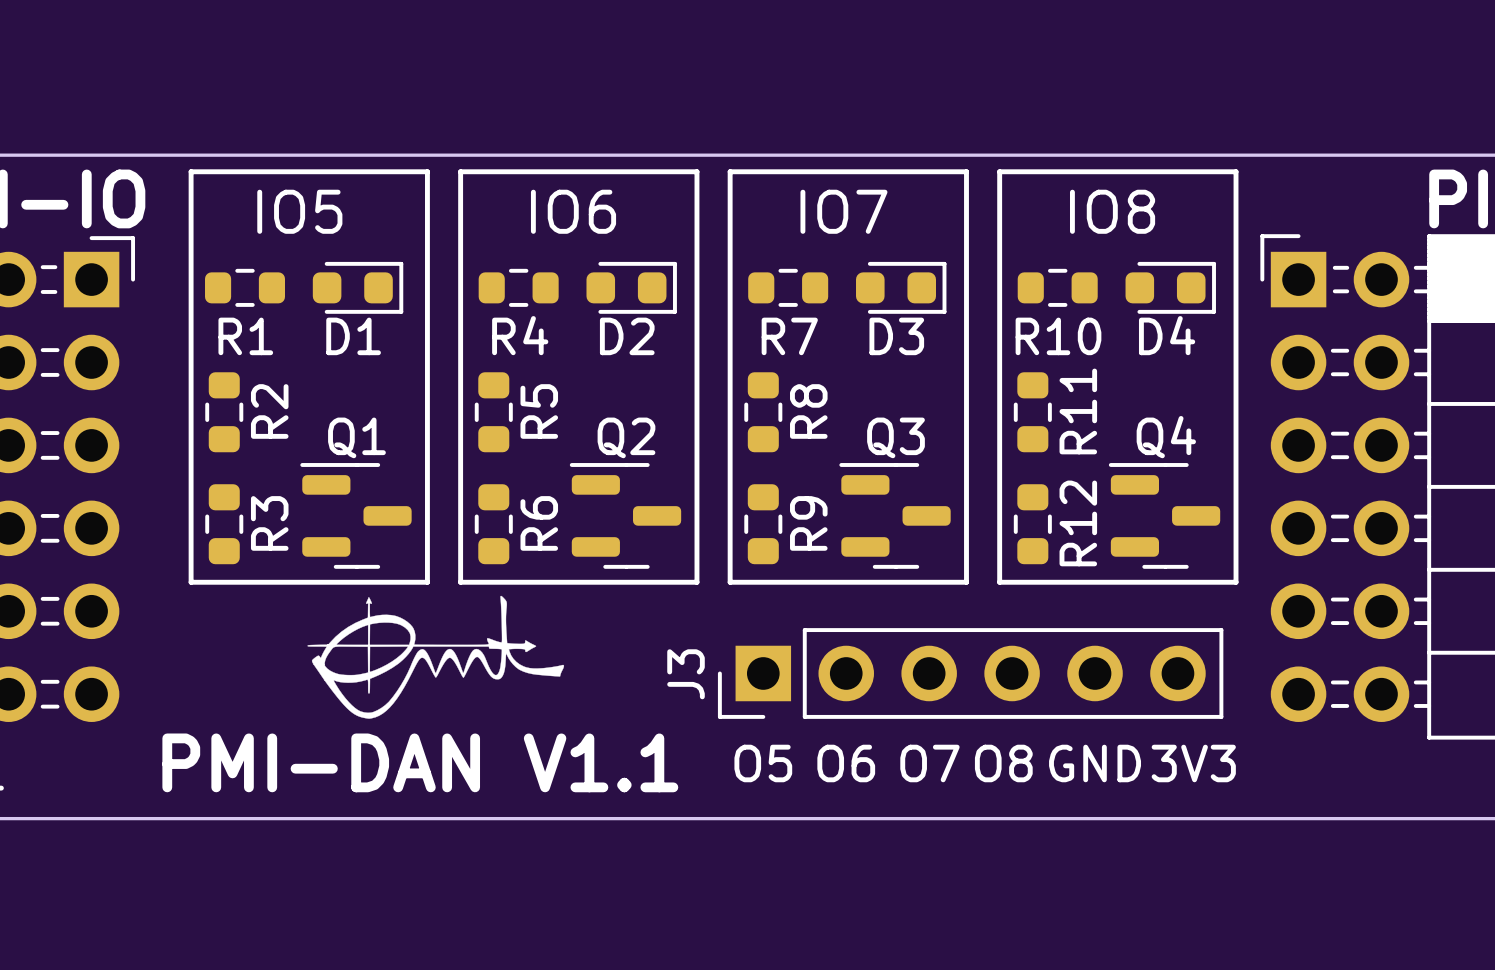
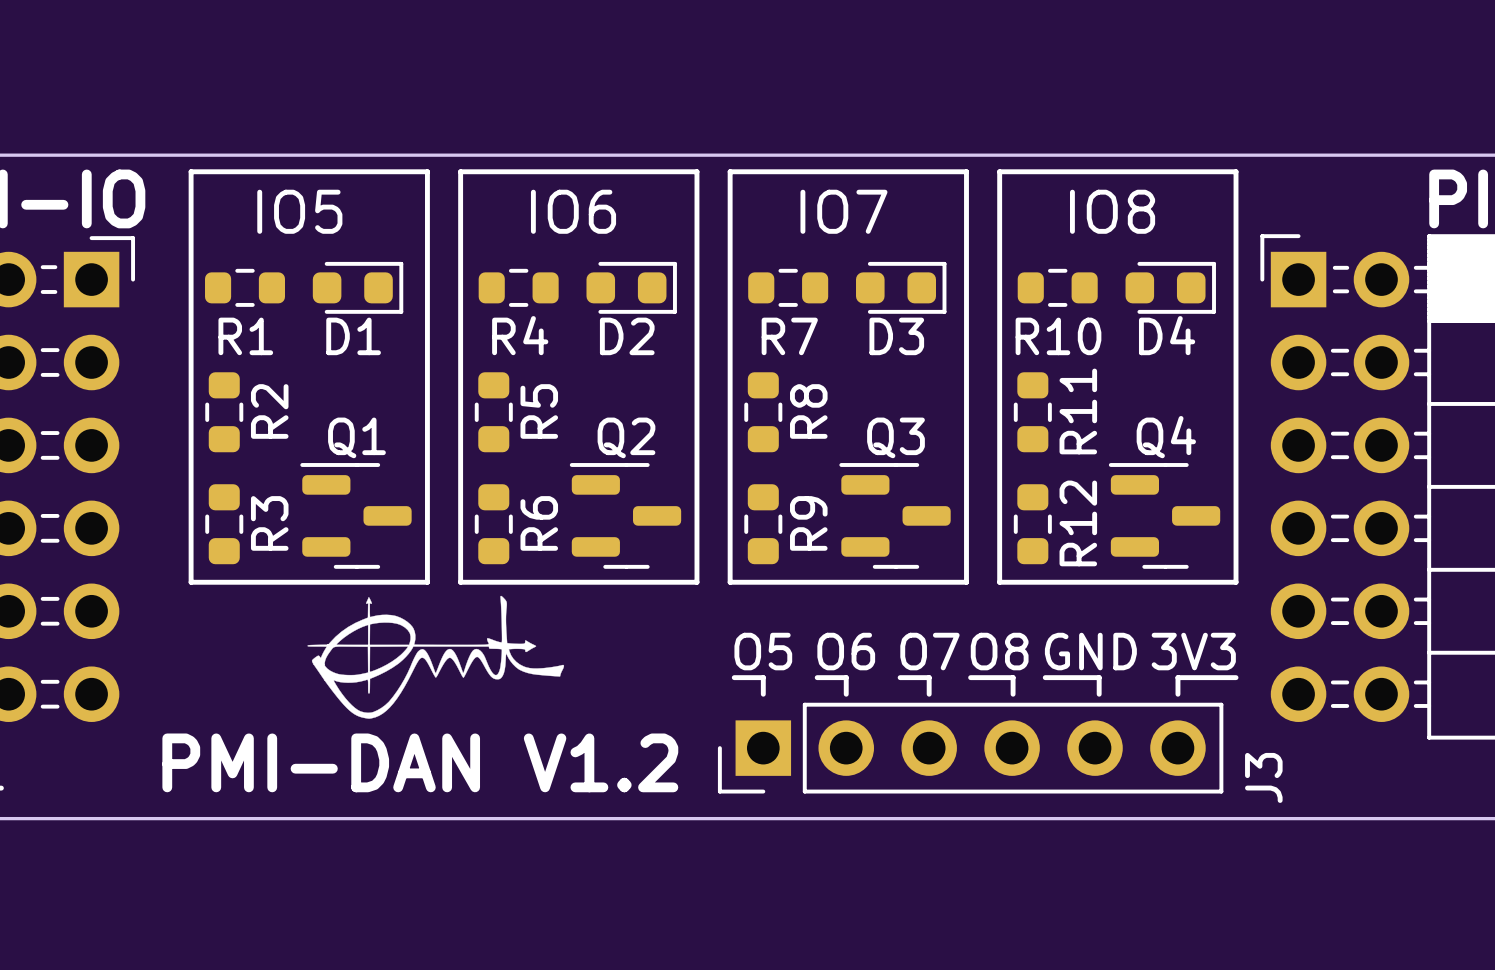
J3 position: (970, 673) -> (970, 748)
J3 name position: J3 (686, 674) -> J3 (1263, 777)
line: none -> (734, 677) (763, 677) (763, 694)
line: none -> (817, 677) (846, 677) (846, 694)
line: none -> (900, 677) (929, 677) (929, 694)
line: none -> (970, 677) (1013, 677) (1013, 694)
line: none -> (1045, 677) (1099, 677) (1099, 694)
line: none -> (1236, 677) (1177, 677) (1177, 694)
text: PMI-DAN V1.1 (420, 762) -> PMI-DAN V1.2 (420, 762)
text position: O5 (763, 763) -> O5 (763, 651)
text position: O6 (846, 763) -> O6 (846, 651)
text position: O7 (929, 763) -> O7 (929, 651)
text position: O8 (1003, 763) -> O8 (999, 651)
text position: GND (1095, 763) -> GND (1090, 651)
text position: 3V3 (1193, 763) -> 3V3 (1193, 651)

